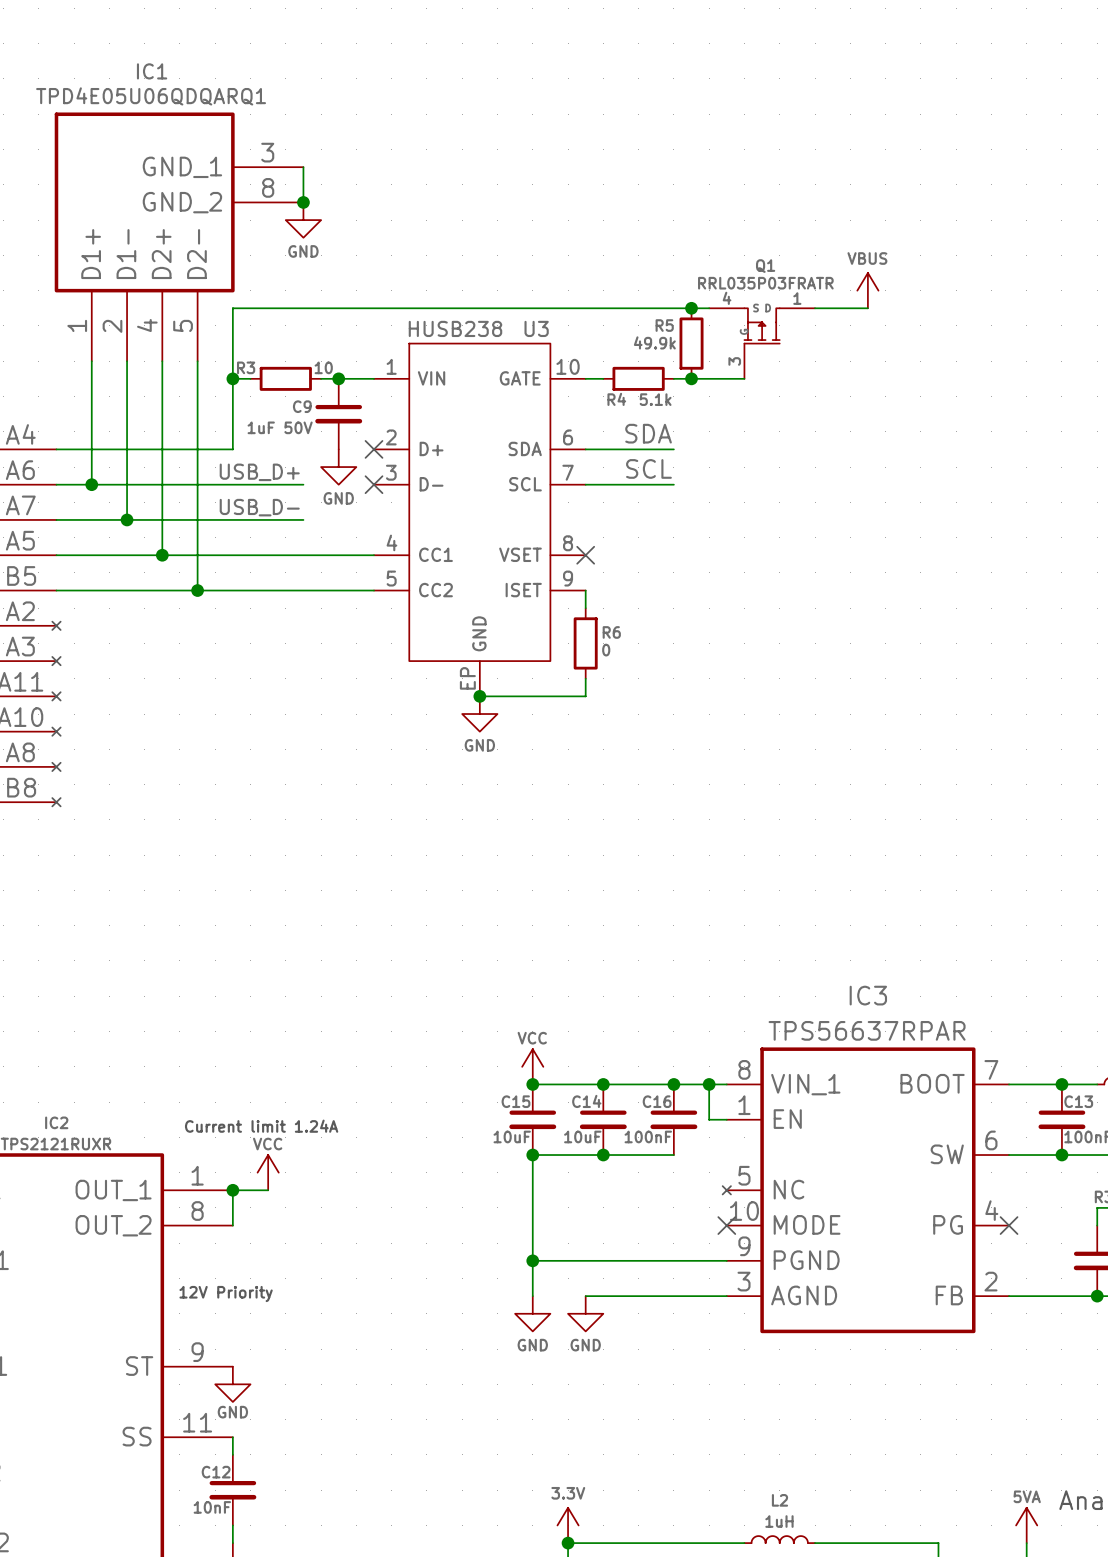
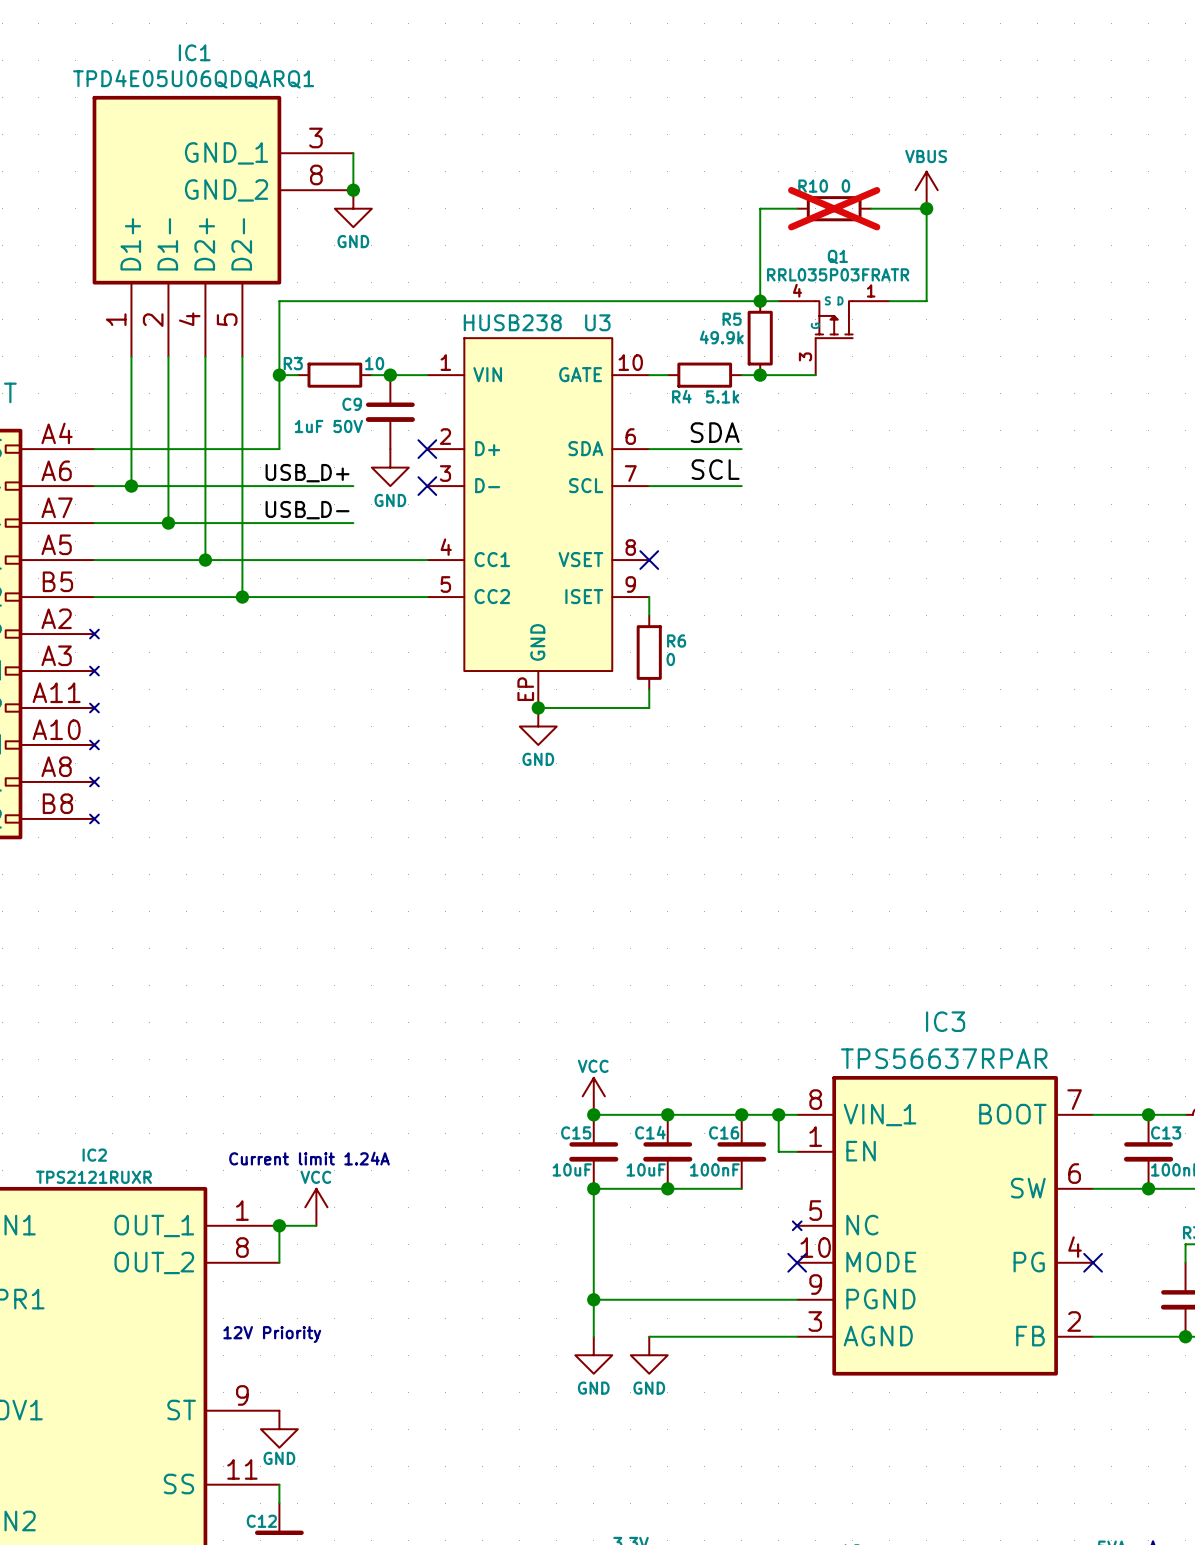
wire: none -> (797, 208) (760, 208) (760, 301)
R10: none -> 0 (834, 208)
junction: none -> (926, 208)
power symbol position: VBUS (867, 290) -> VBUS (926, 190)
wire: (850, 308) (867, 308) -> (926, 301) (926, 208) (871, 208)

